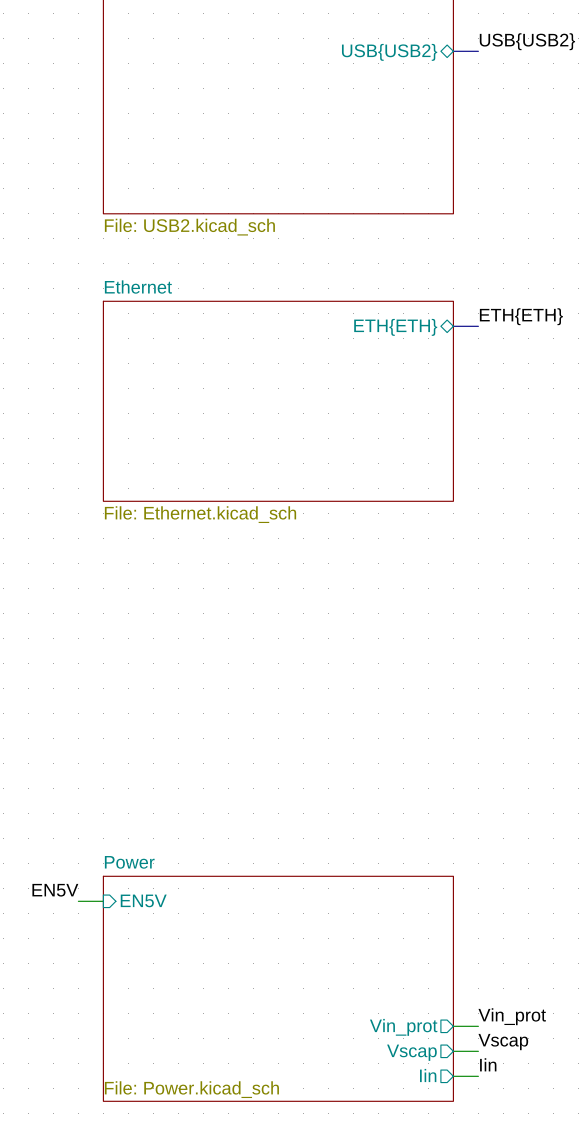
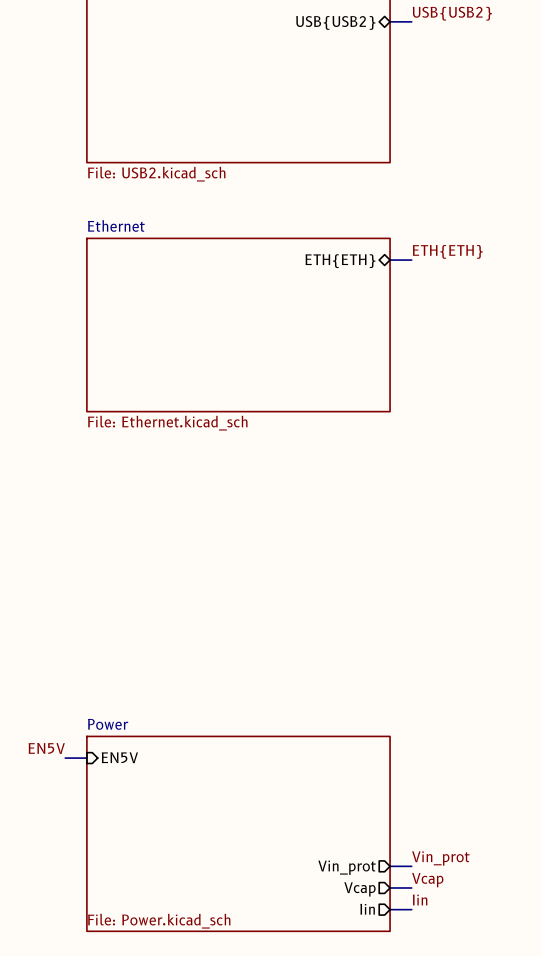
label: Vscap (503, 1042) -> Vcap (427, 880)
sheet pin: Vscap (411, 1052) -> Vcap (359, 889)

